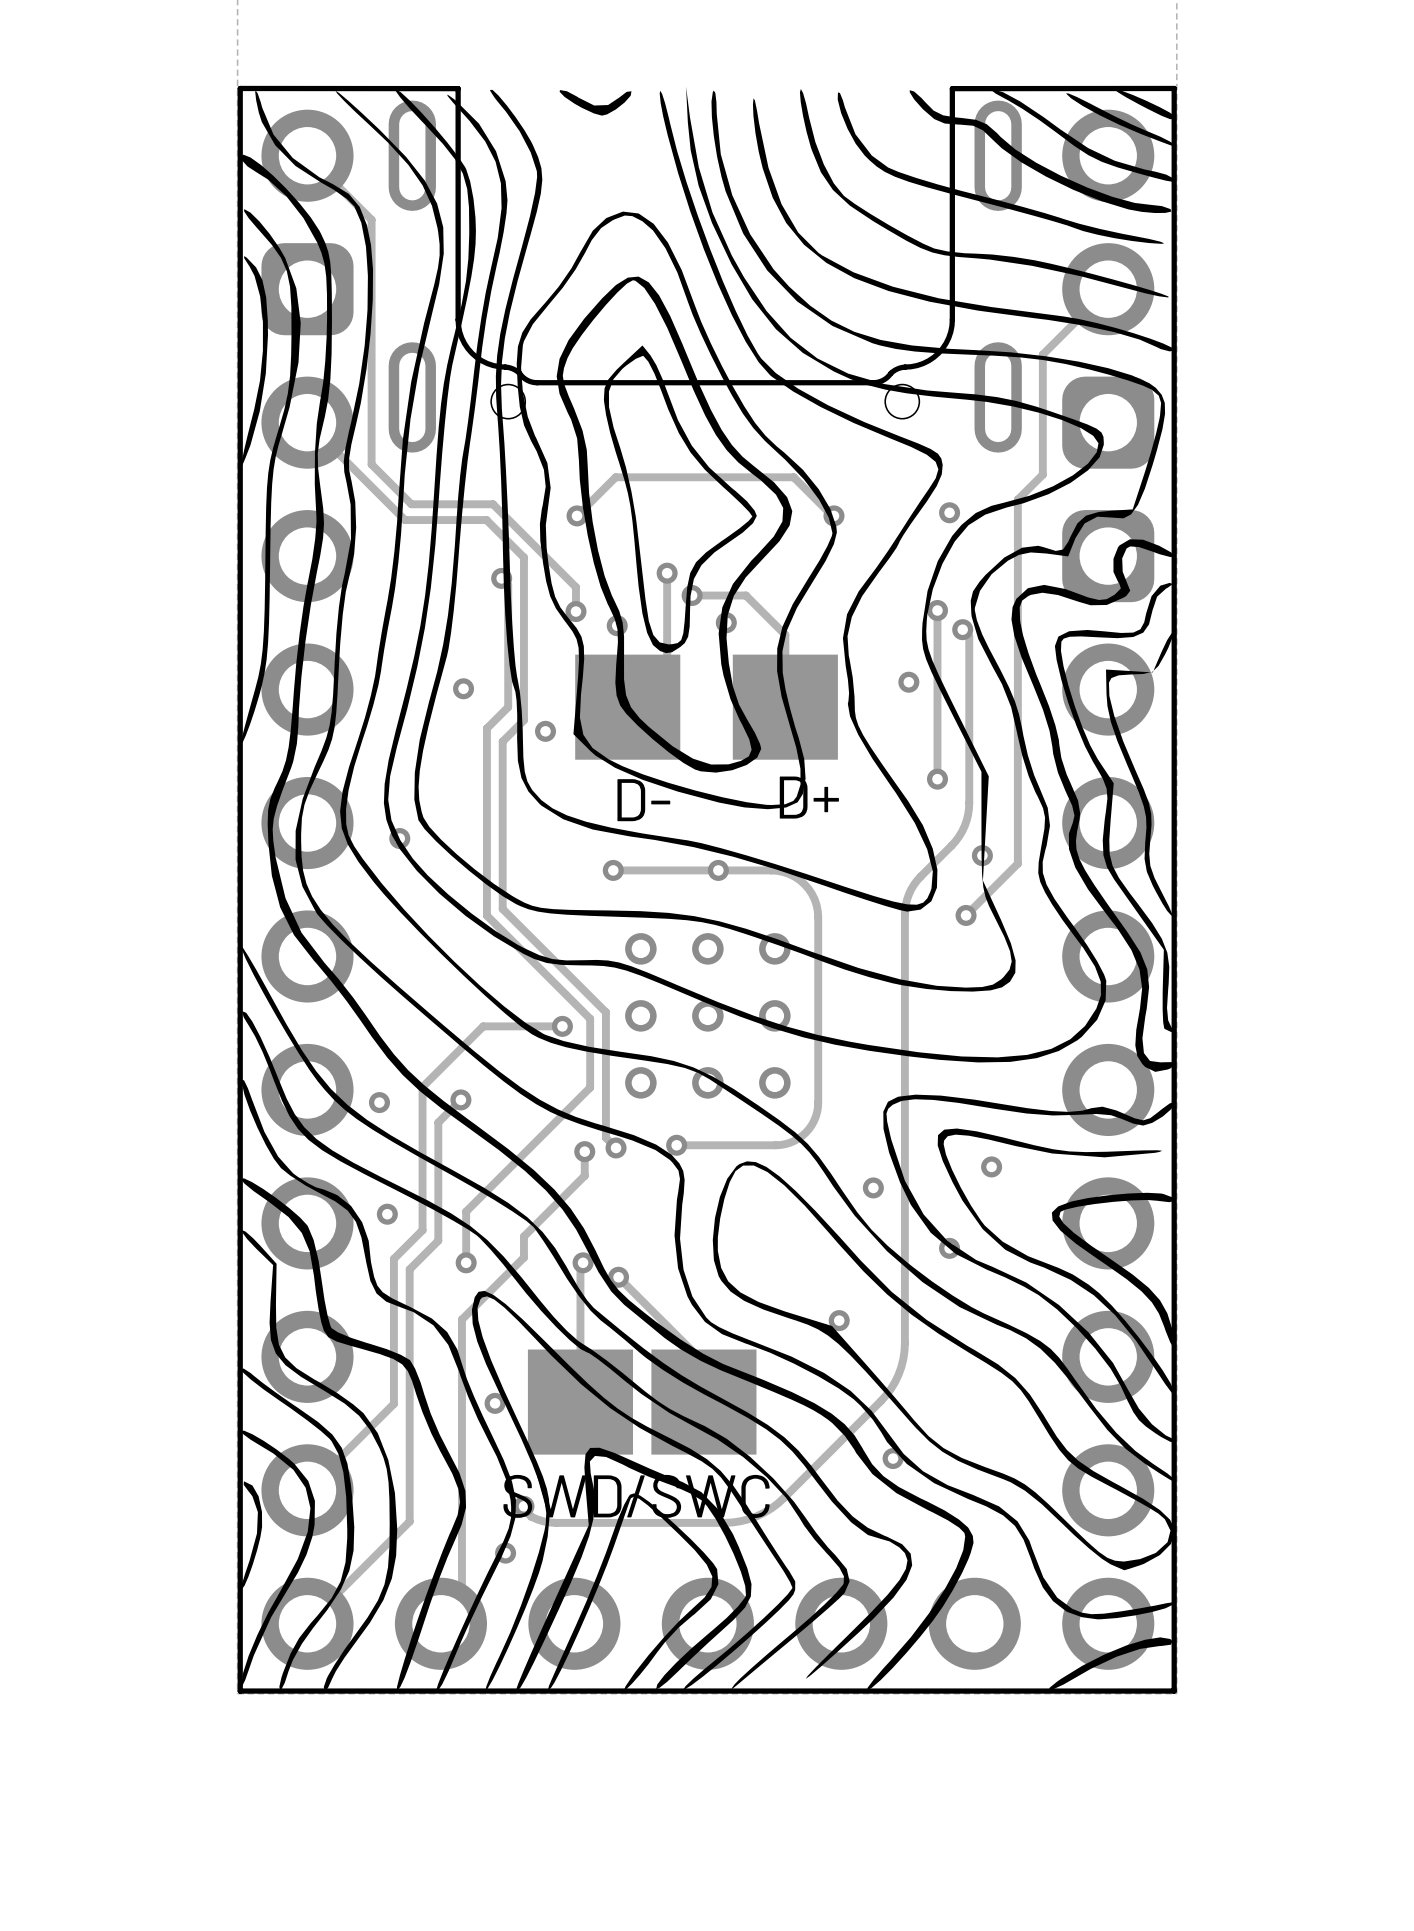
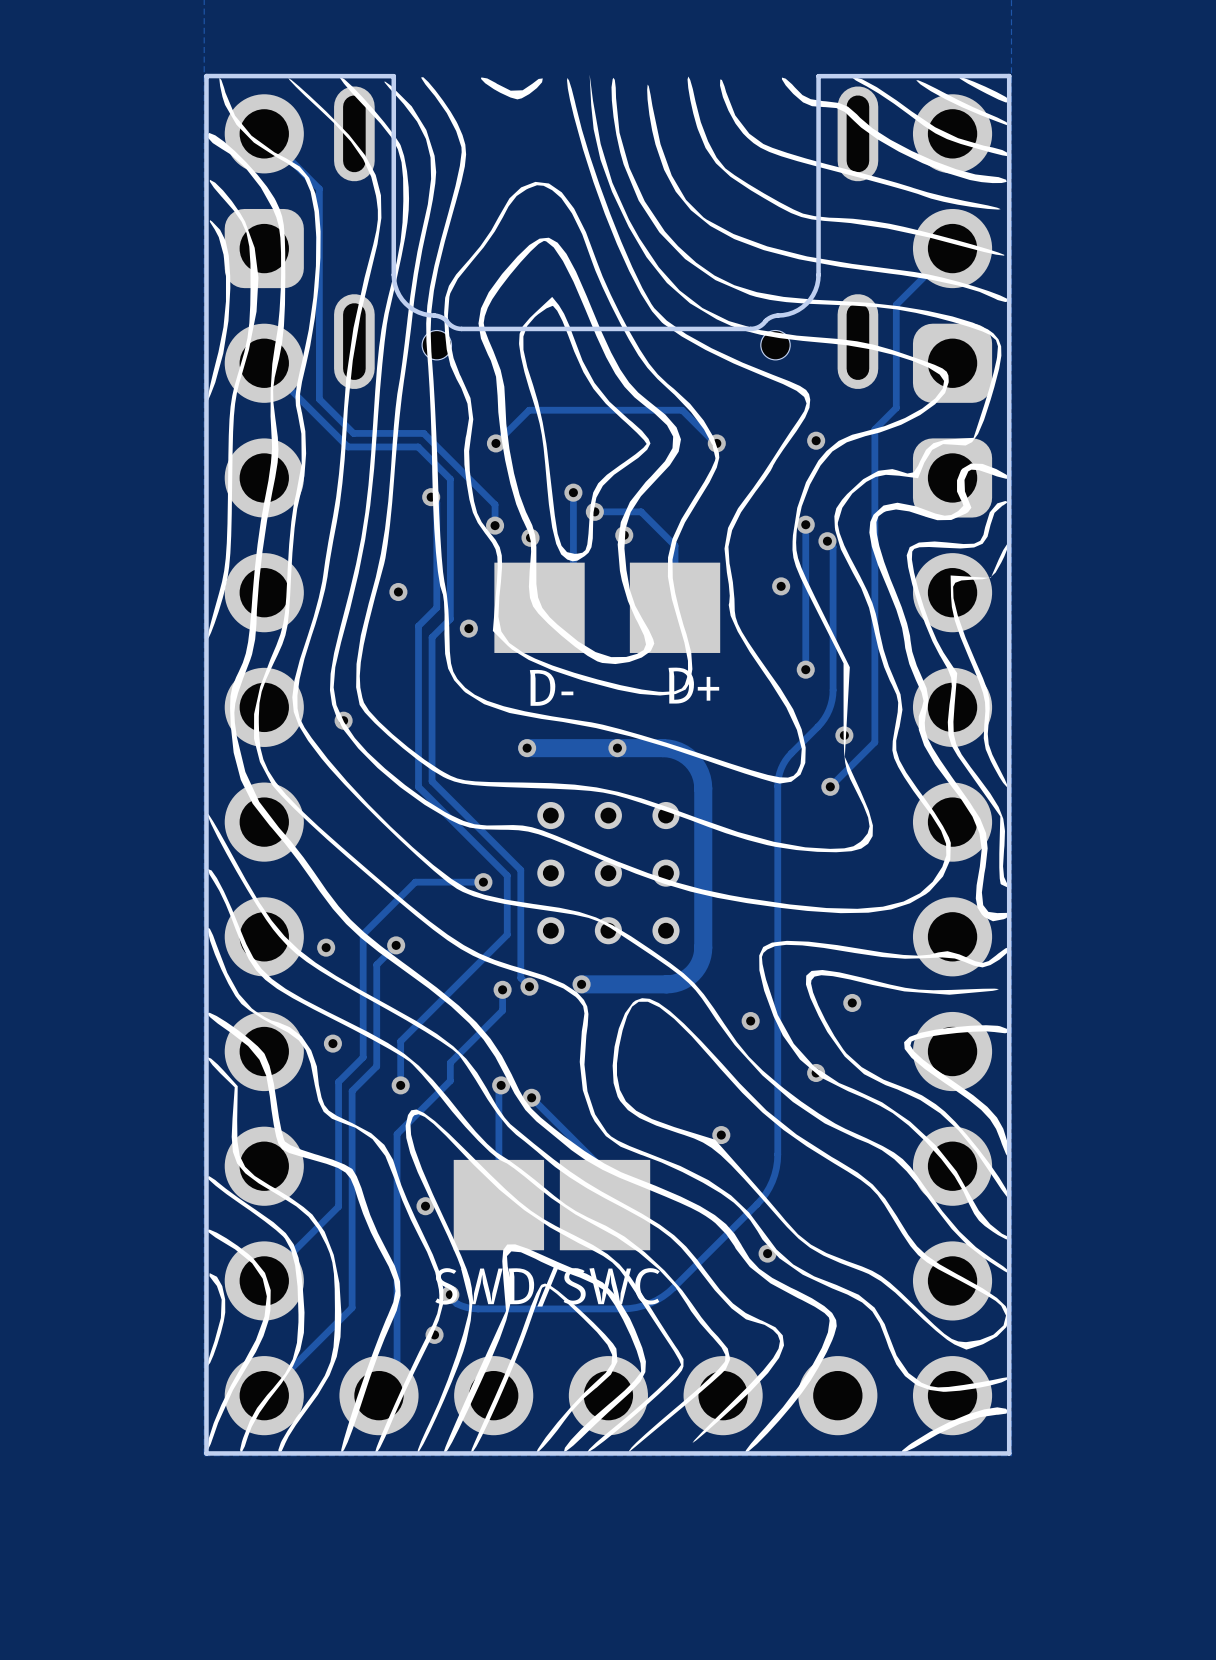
track width: thin (613, 870) (777, 870) (789, 874) (799, 880) (808, 888) (816, 905) (818, 917) (818, 1102) (815, 1116) (811, 1125) (798, 1138) (780, 1145) (676, 1145) -> thick (527, 748) (668, 748) (687, 756) (694, 763) (701, 778) (703, 947) (697, 967) (686, 978) (670, 984) (581, 984)

